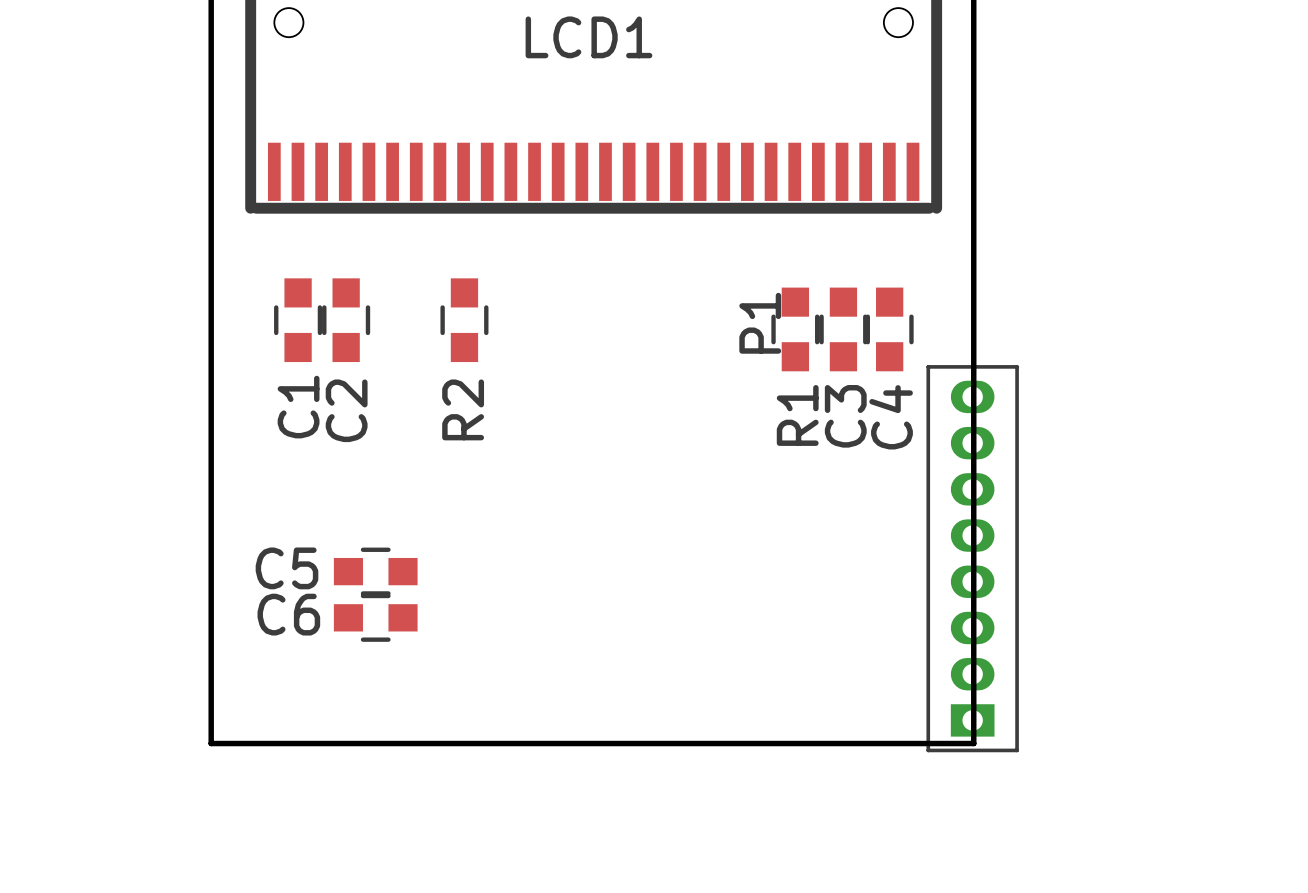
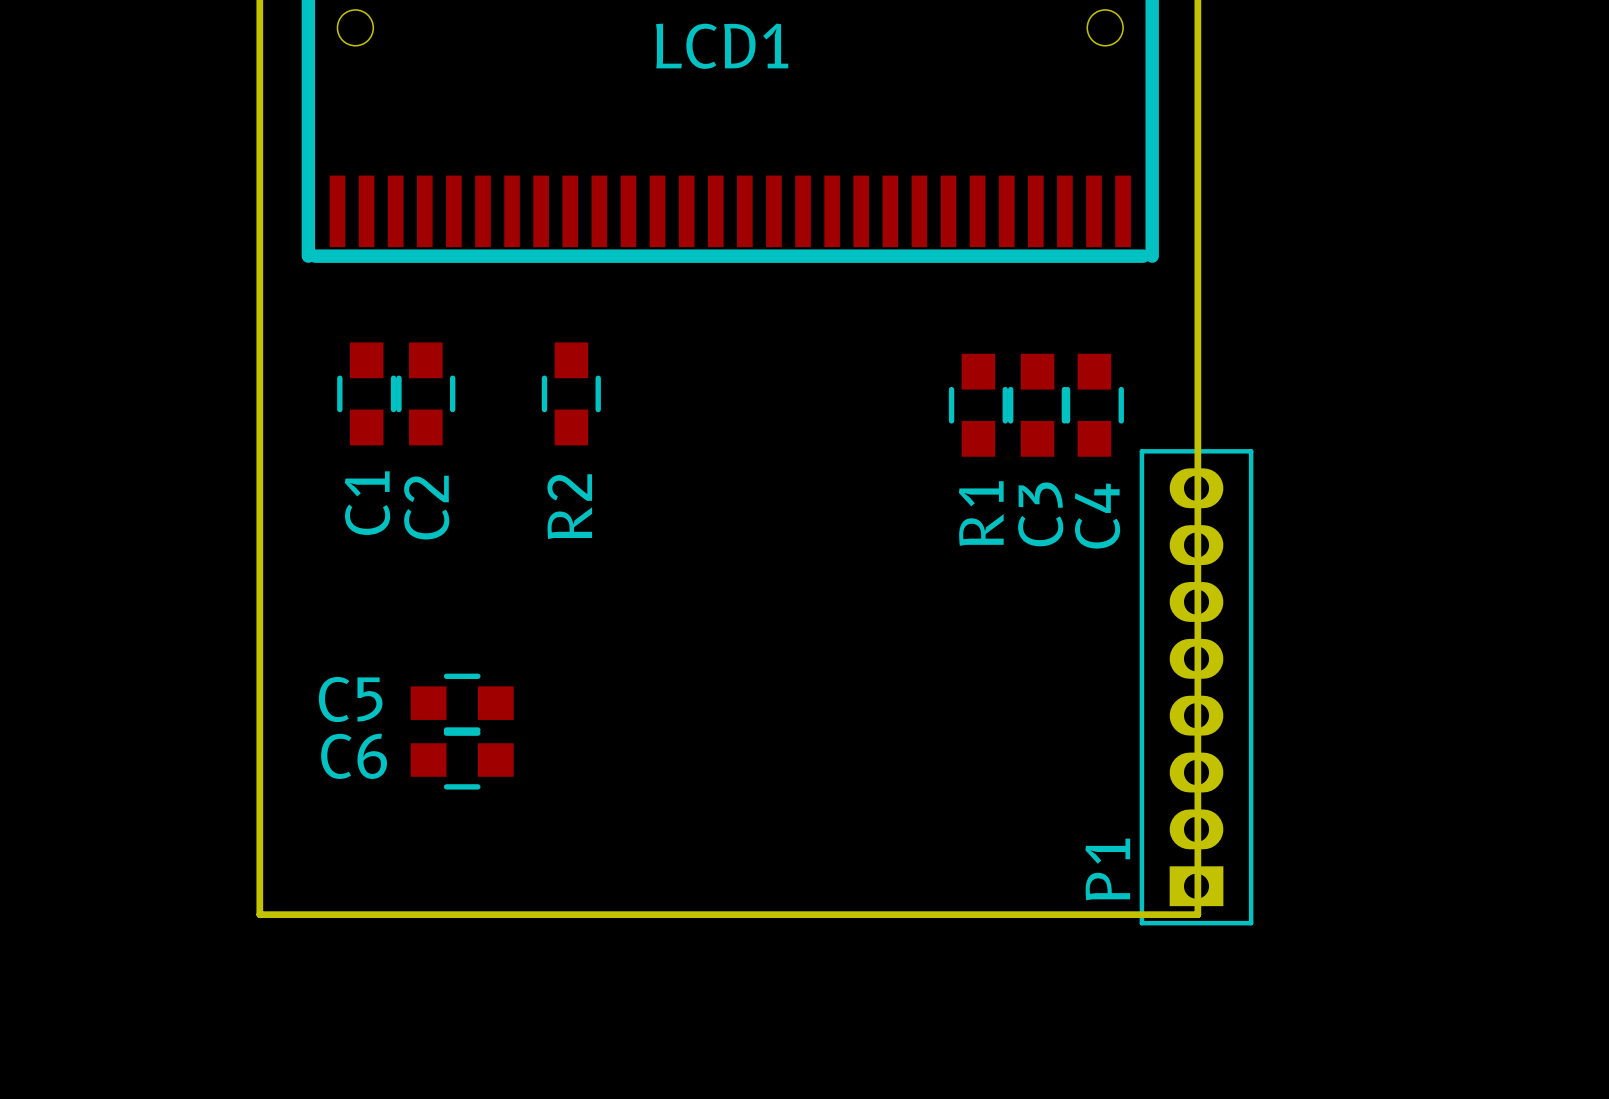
P1 name position: P1 (760, 323) -> P1 (1107, 869)

